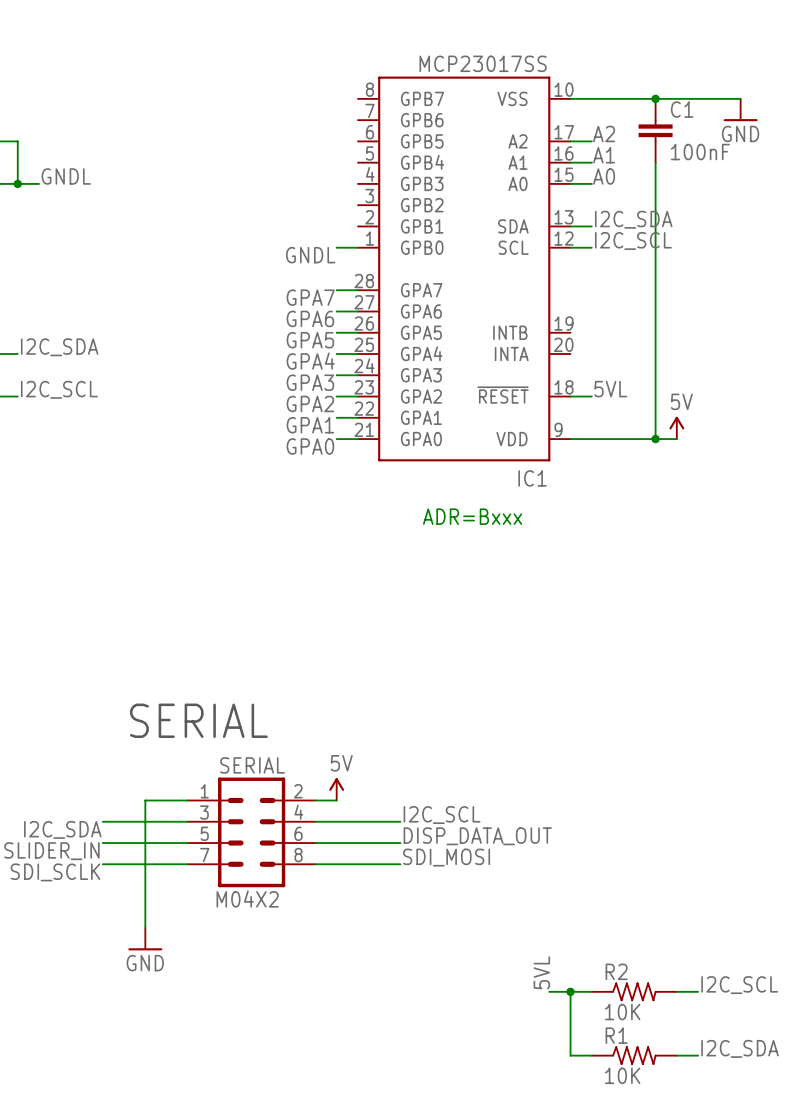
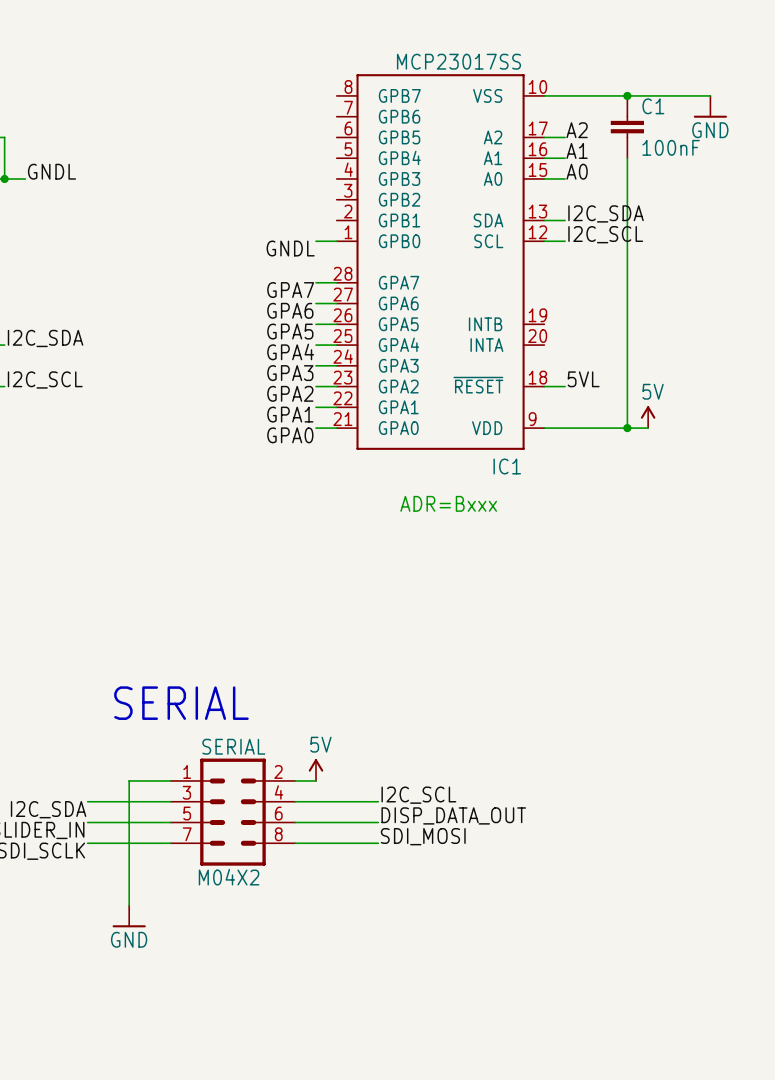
label: 5VL (541, 972) -> none
label: I2C_SCL (739, 985) -> none
wire: (549, 991) (591, 991) -> none
wire: (570, 991) (570, 1055) (591, 1055) -> none
junction: (570, 991) -> none
R2: 10K (634, 991) -> none
wire: (676, 991) (698, 991) -> none
label: I2C_SDA (740, 1048) -> none
R1: 10K (634, 1055) -> none
wire: (676, 1055) (698, 1055) -> none

